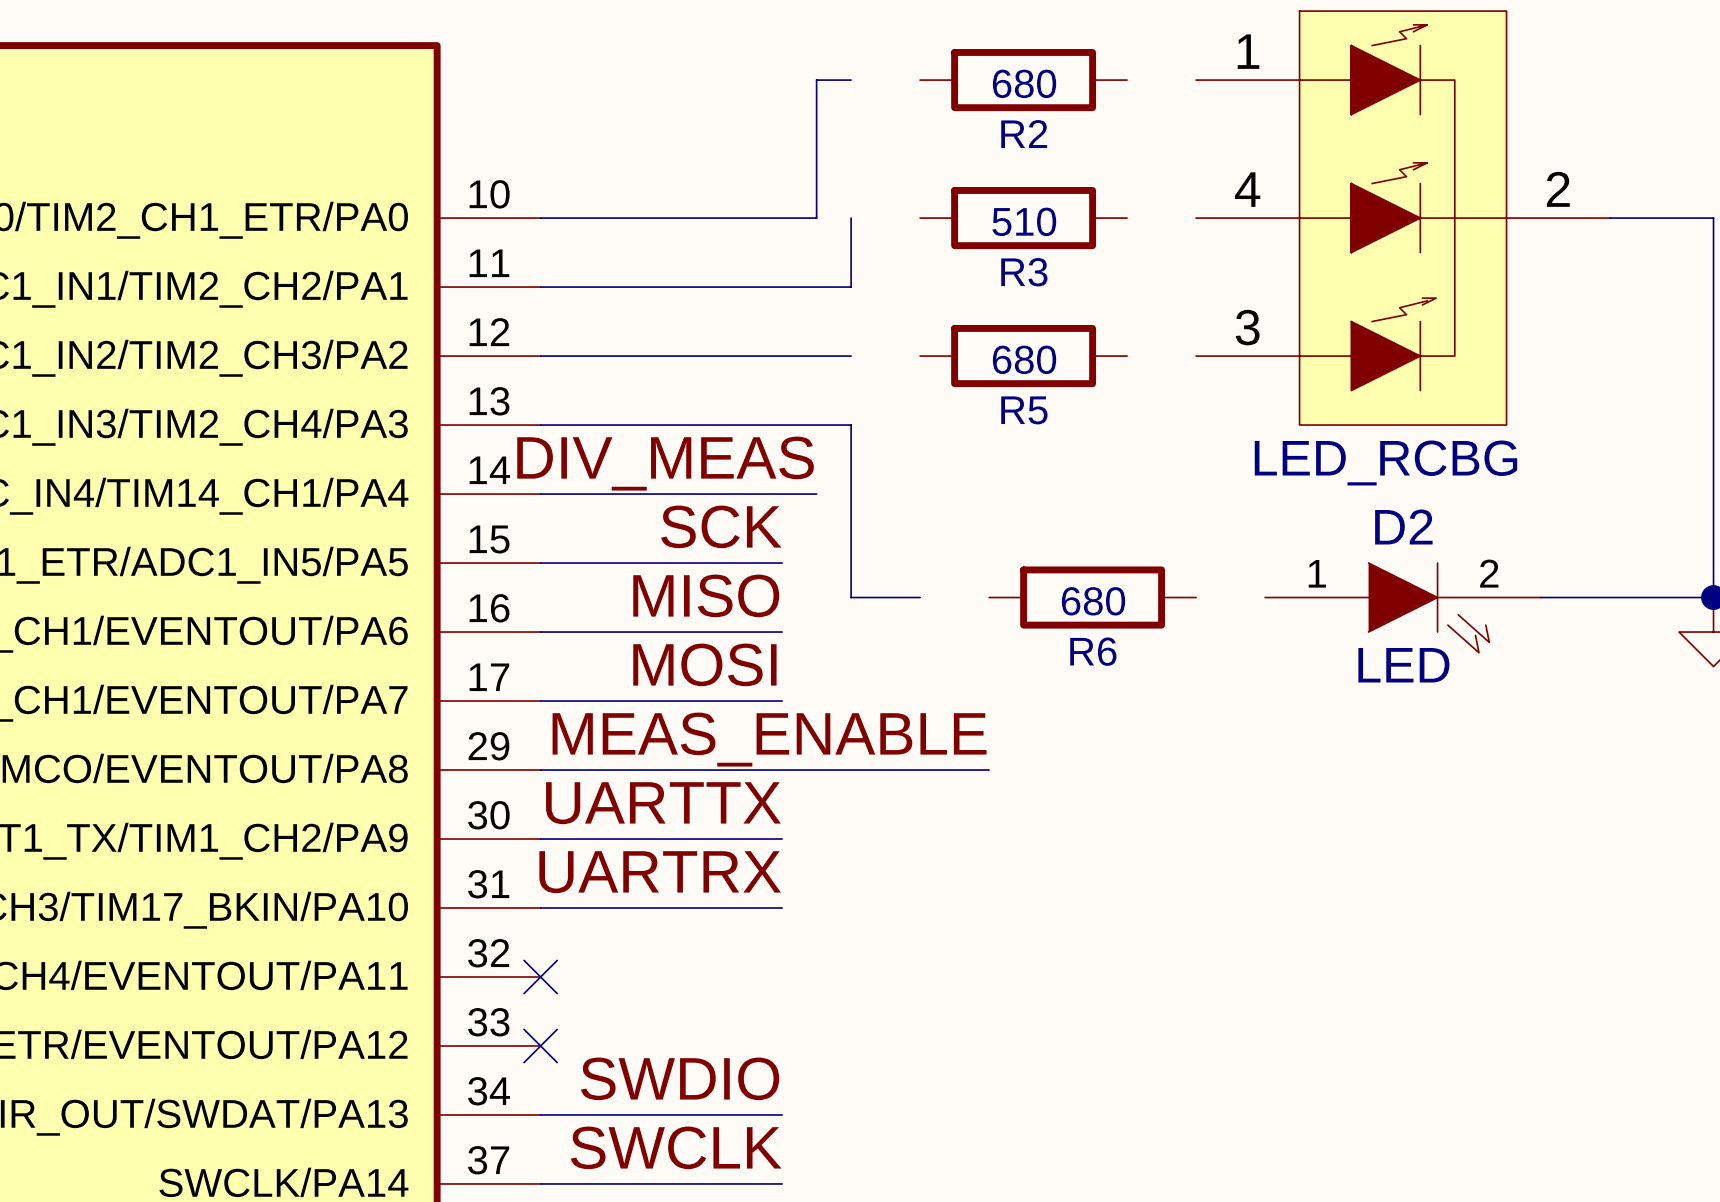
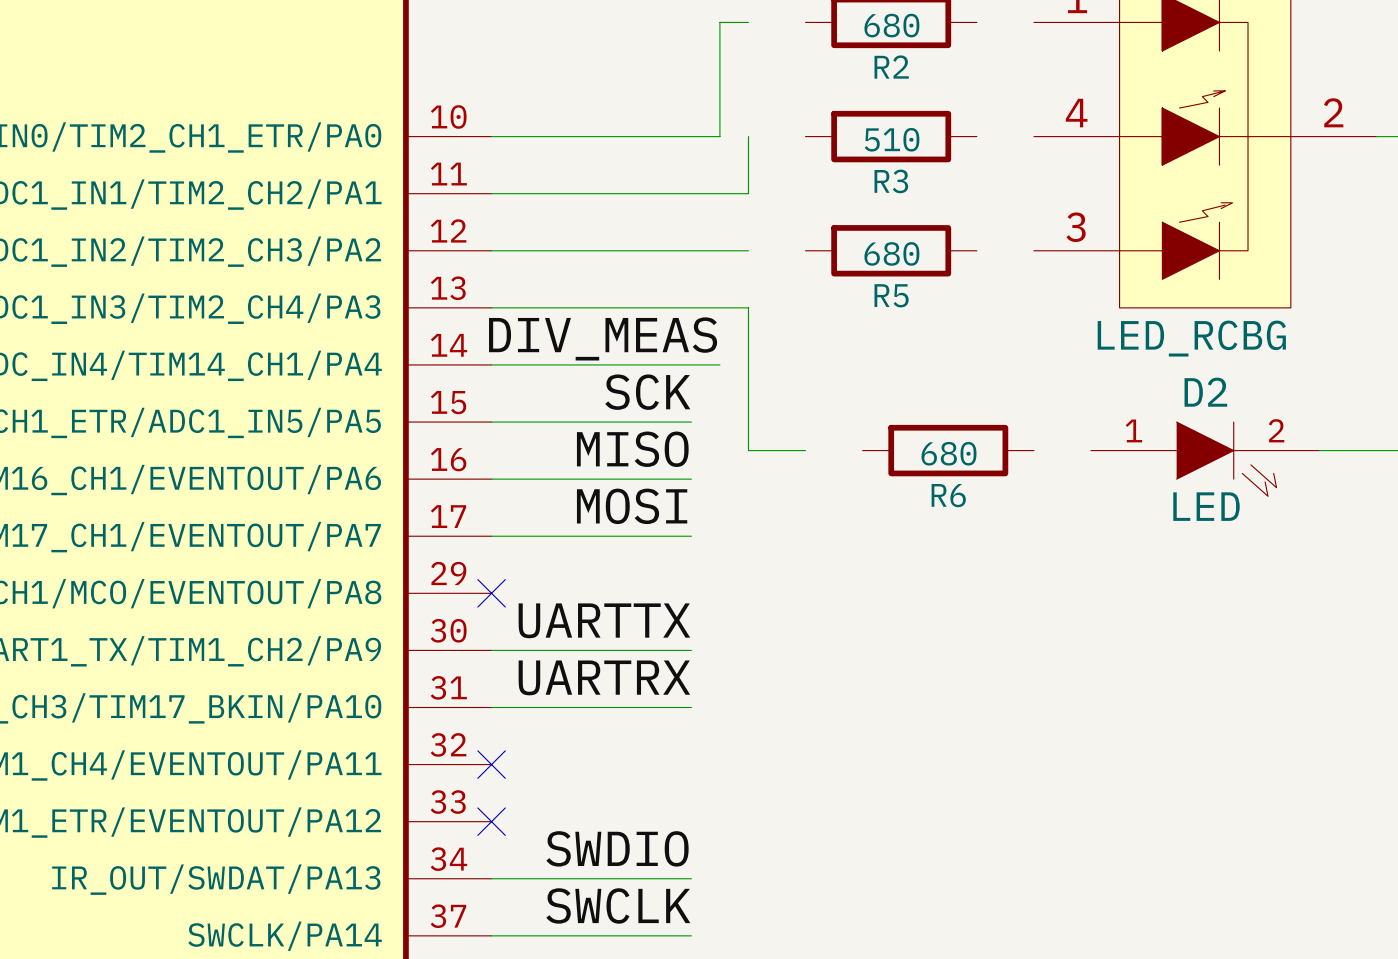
label: MEAS_ENABLE (769, 739) -> none
wire: (540, 770) (989, 770) -> none
no-connect mark: none -> (491, 593)

